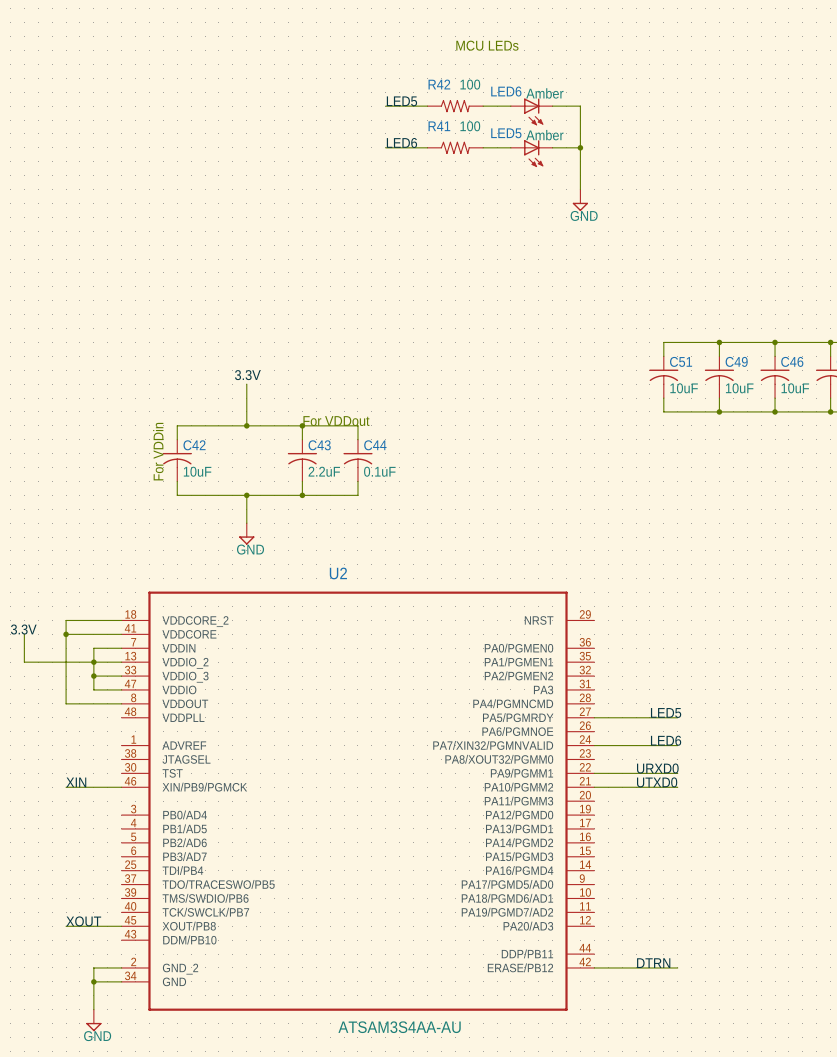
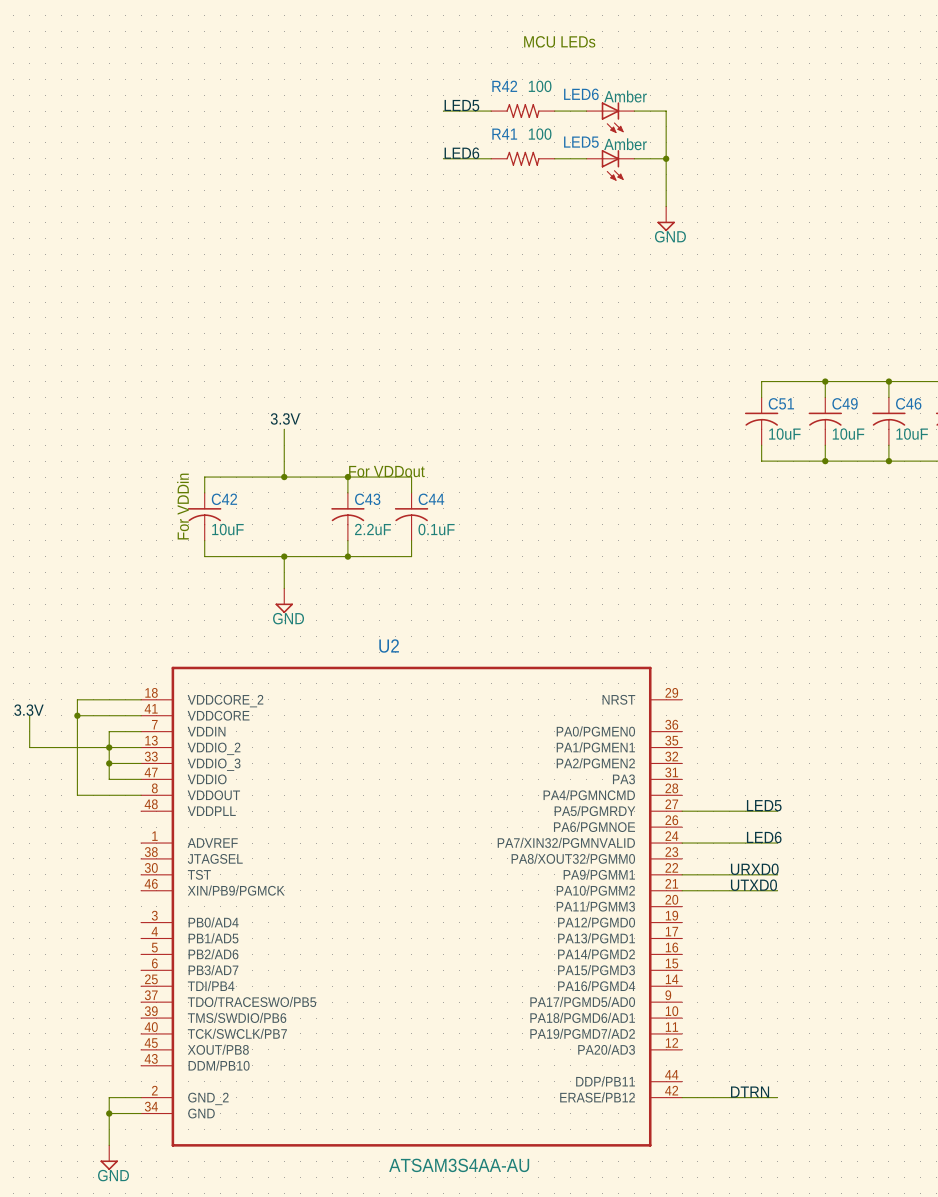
label: XIN (76, 782) -> none
wire: (66, 787) (121, 787) -> none
label: XOUT (83, 921) -> none
wire: (66, 926) (121, 926) -> none

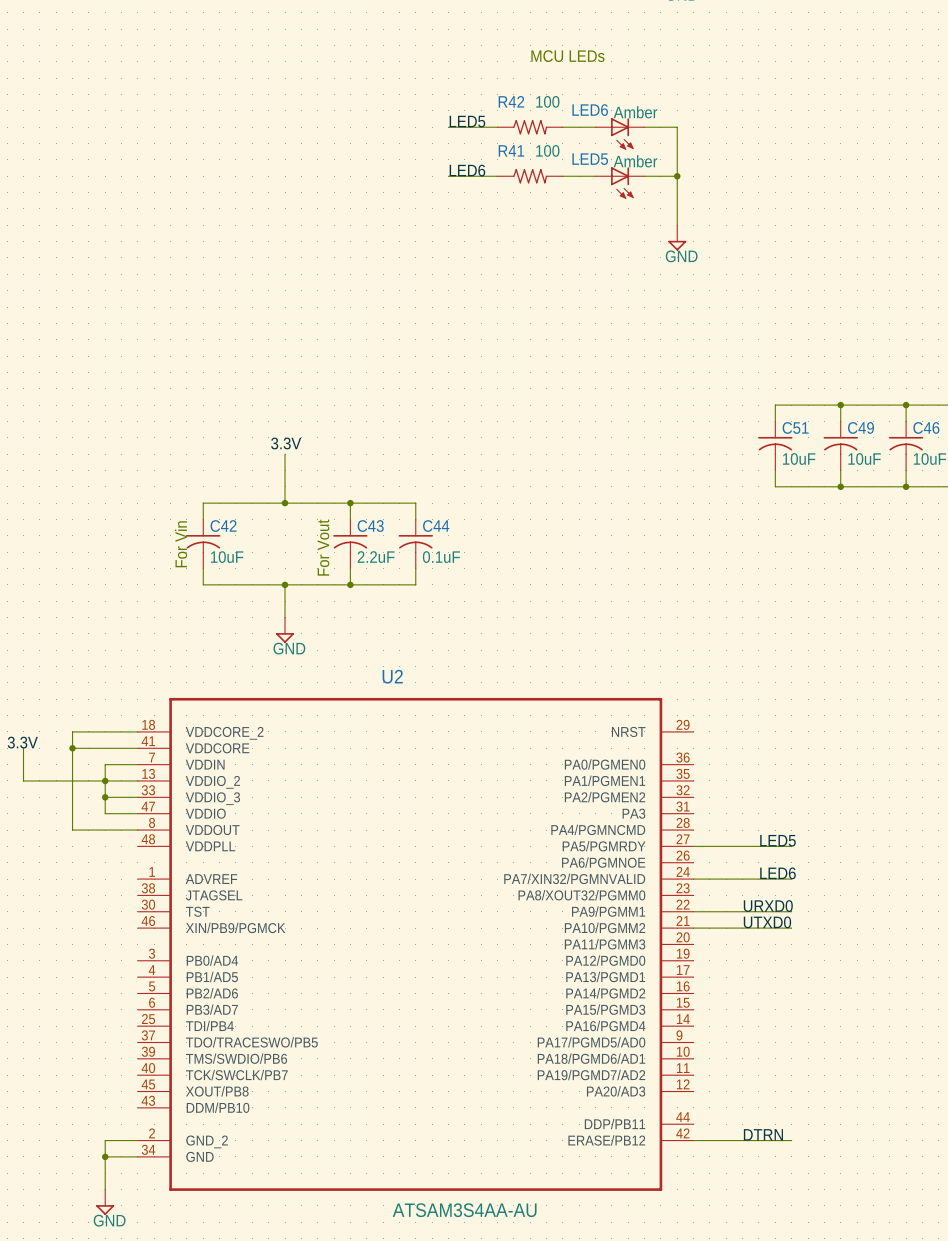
text: For VDDout (386, 471) -> none
text: For VDDin (183, 506) -> For Vin (181, 544)
text: none -> For Vout (323, 547)

